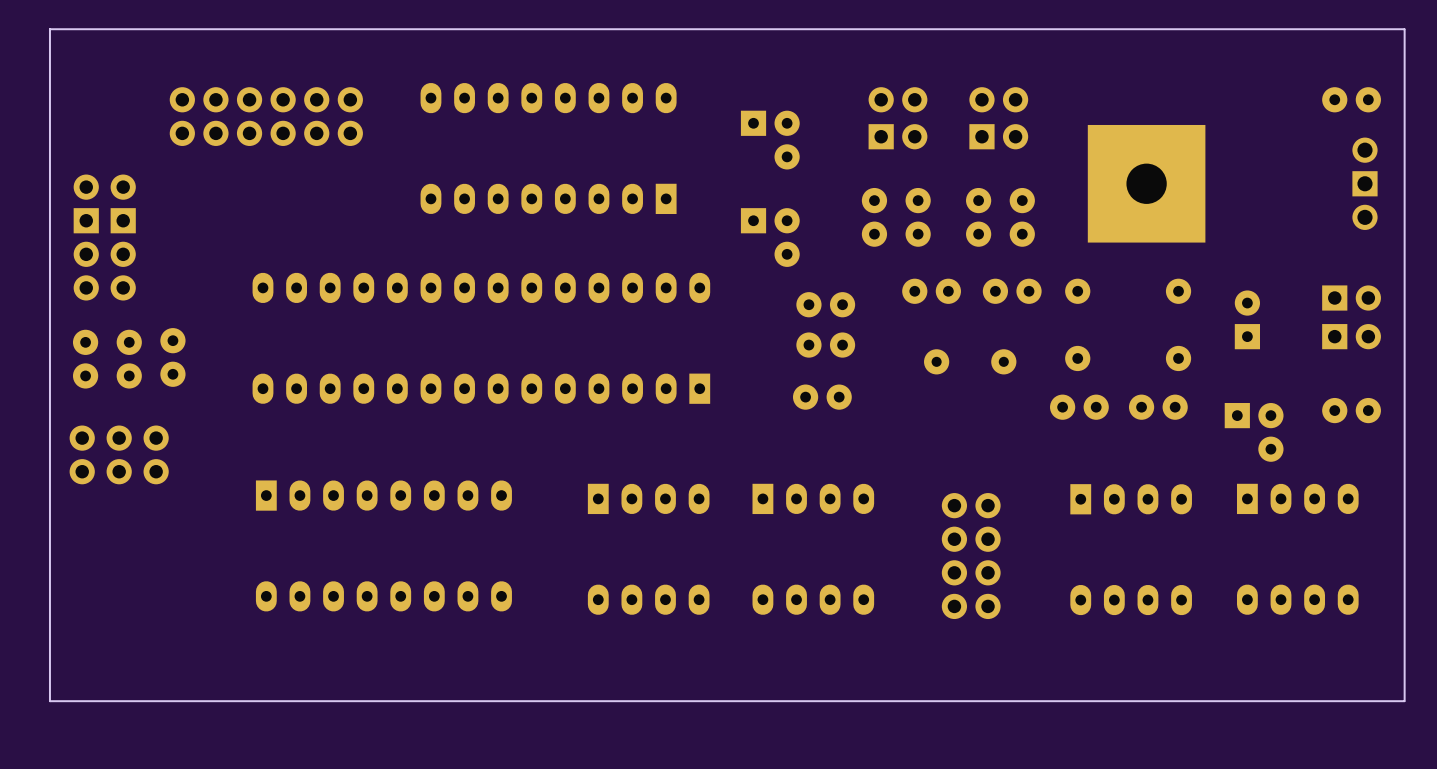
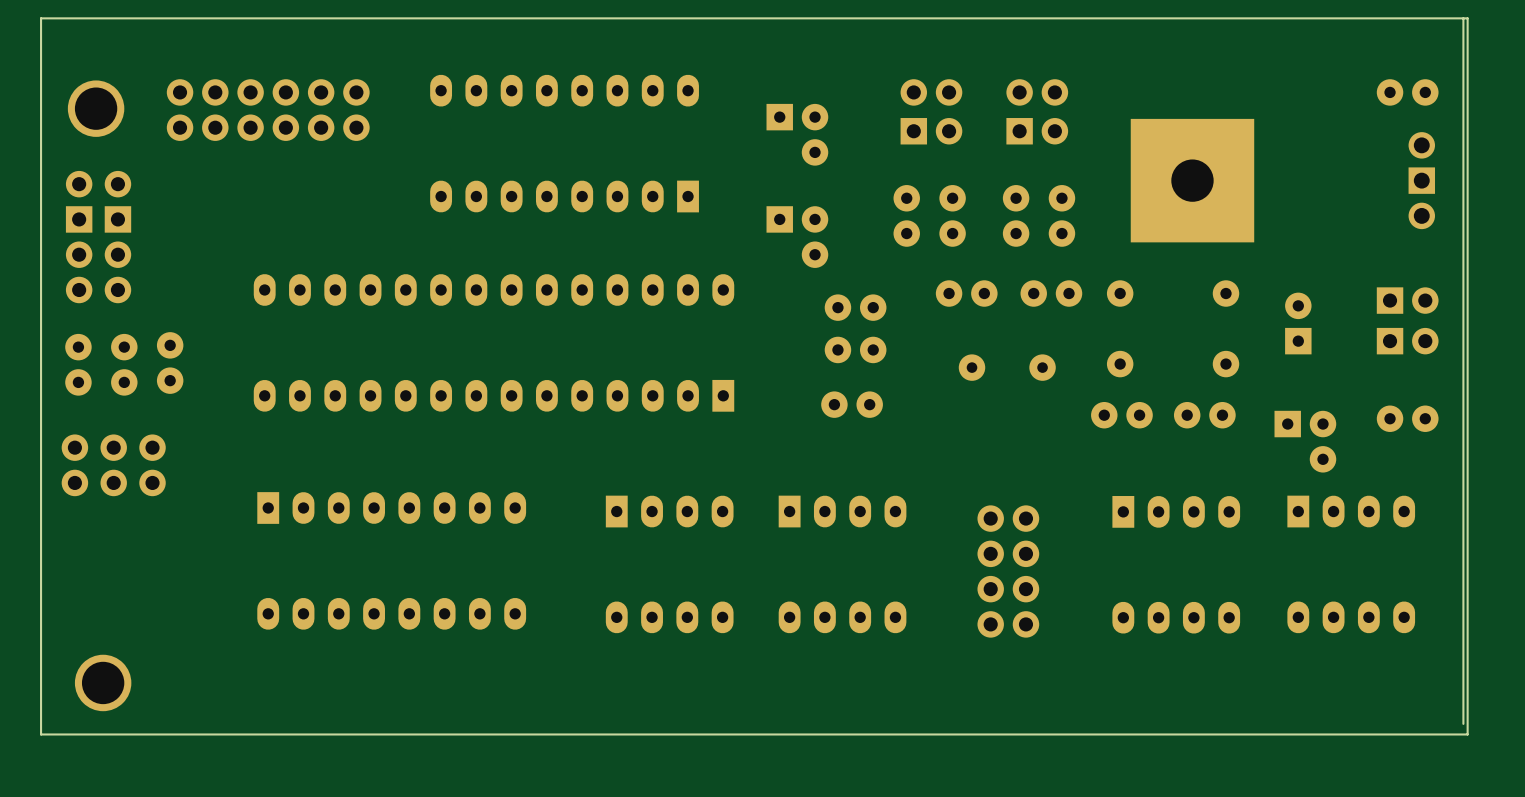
part: none -> (96, 108)
part: none -> (103, 682)
board edge: (1404, 701) (49, 701) -> (1463, 18) (1467, 18) (1467, 734) (41, 734) (41, 723)

